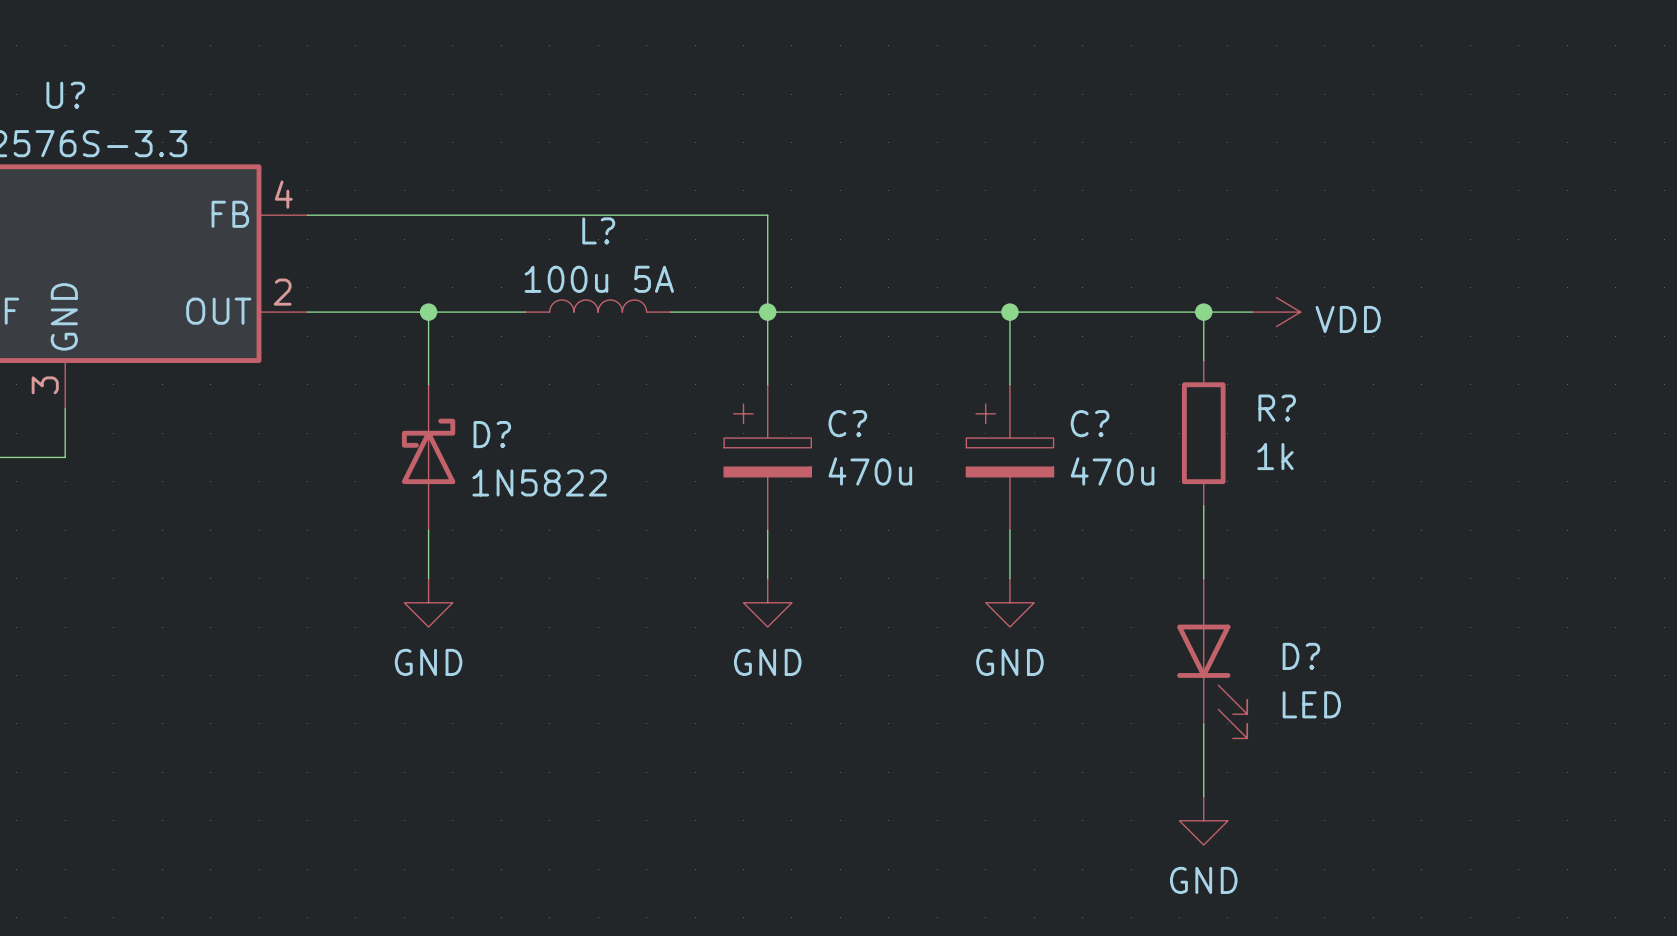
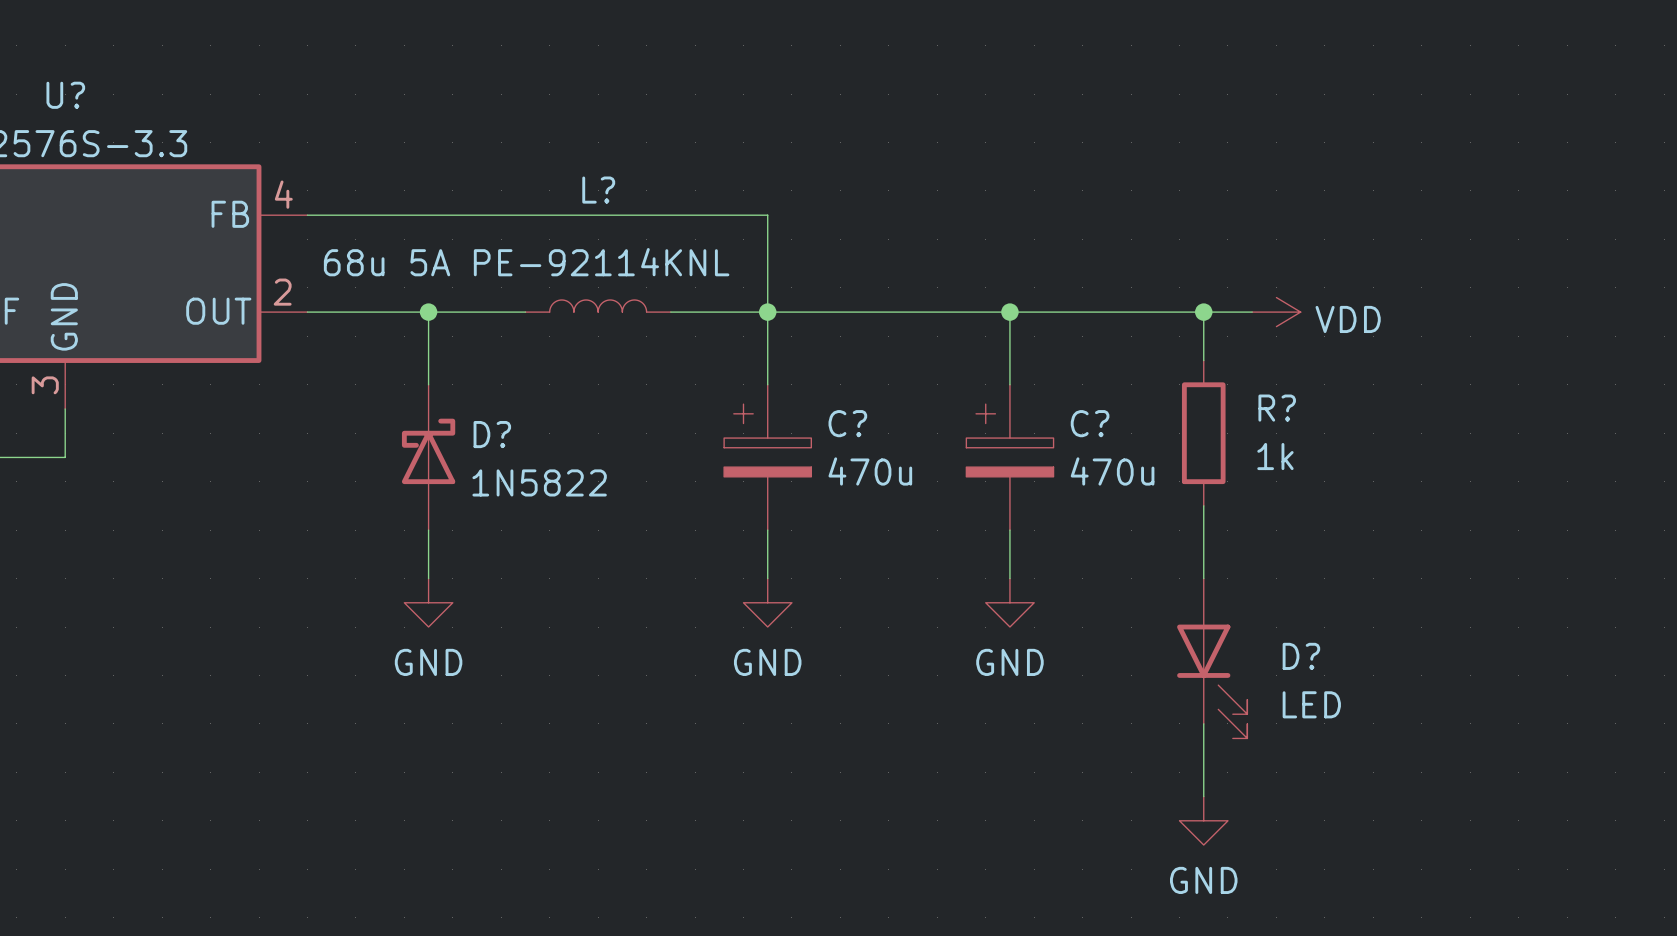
L? name position: L? (598, 230) -> L? (598, 190)
L? value: 100u 5A (599, 279) -> 68u 5A PE-92114KNL (526, 262)

